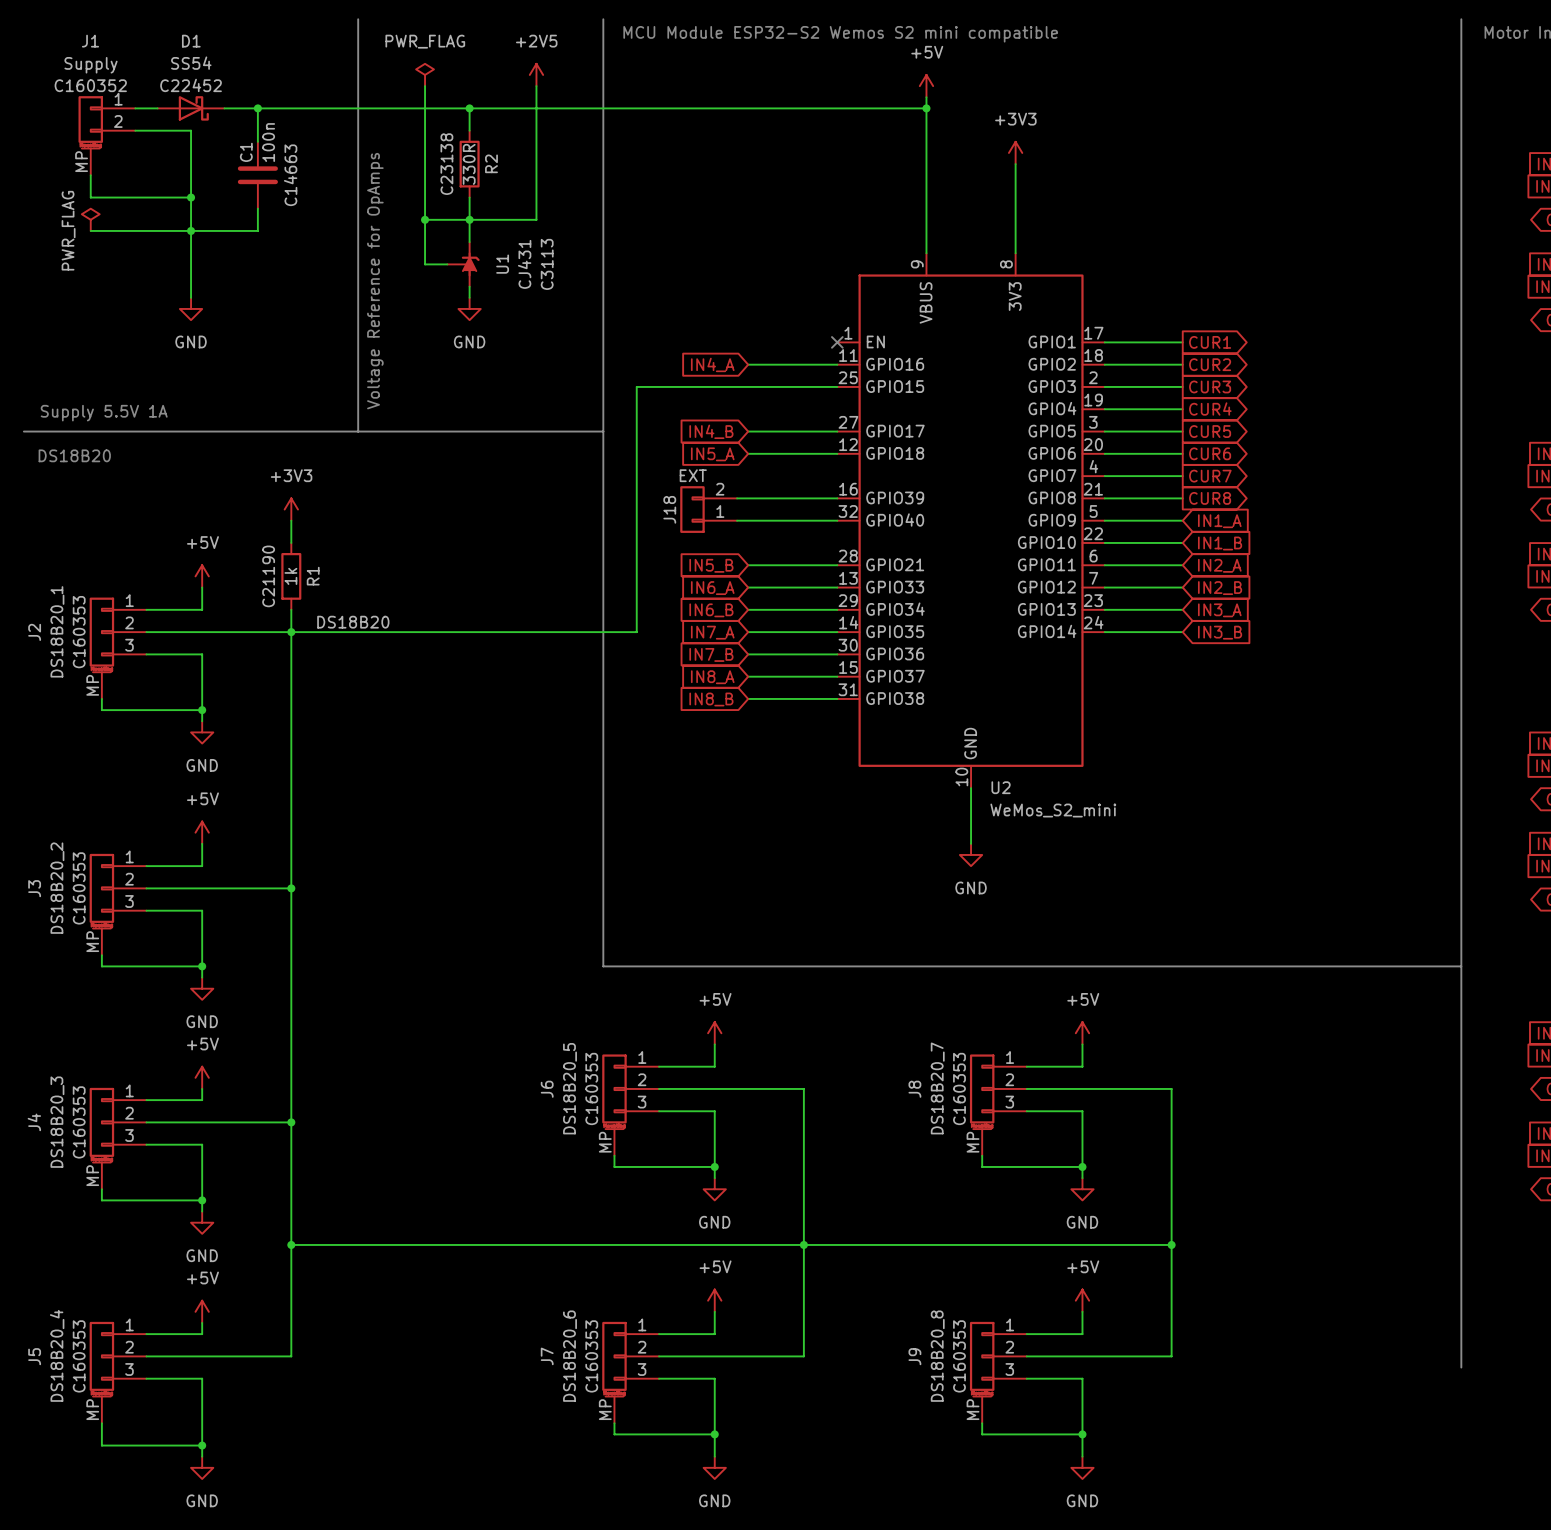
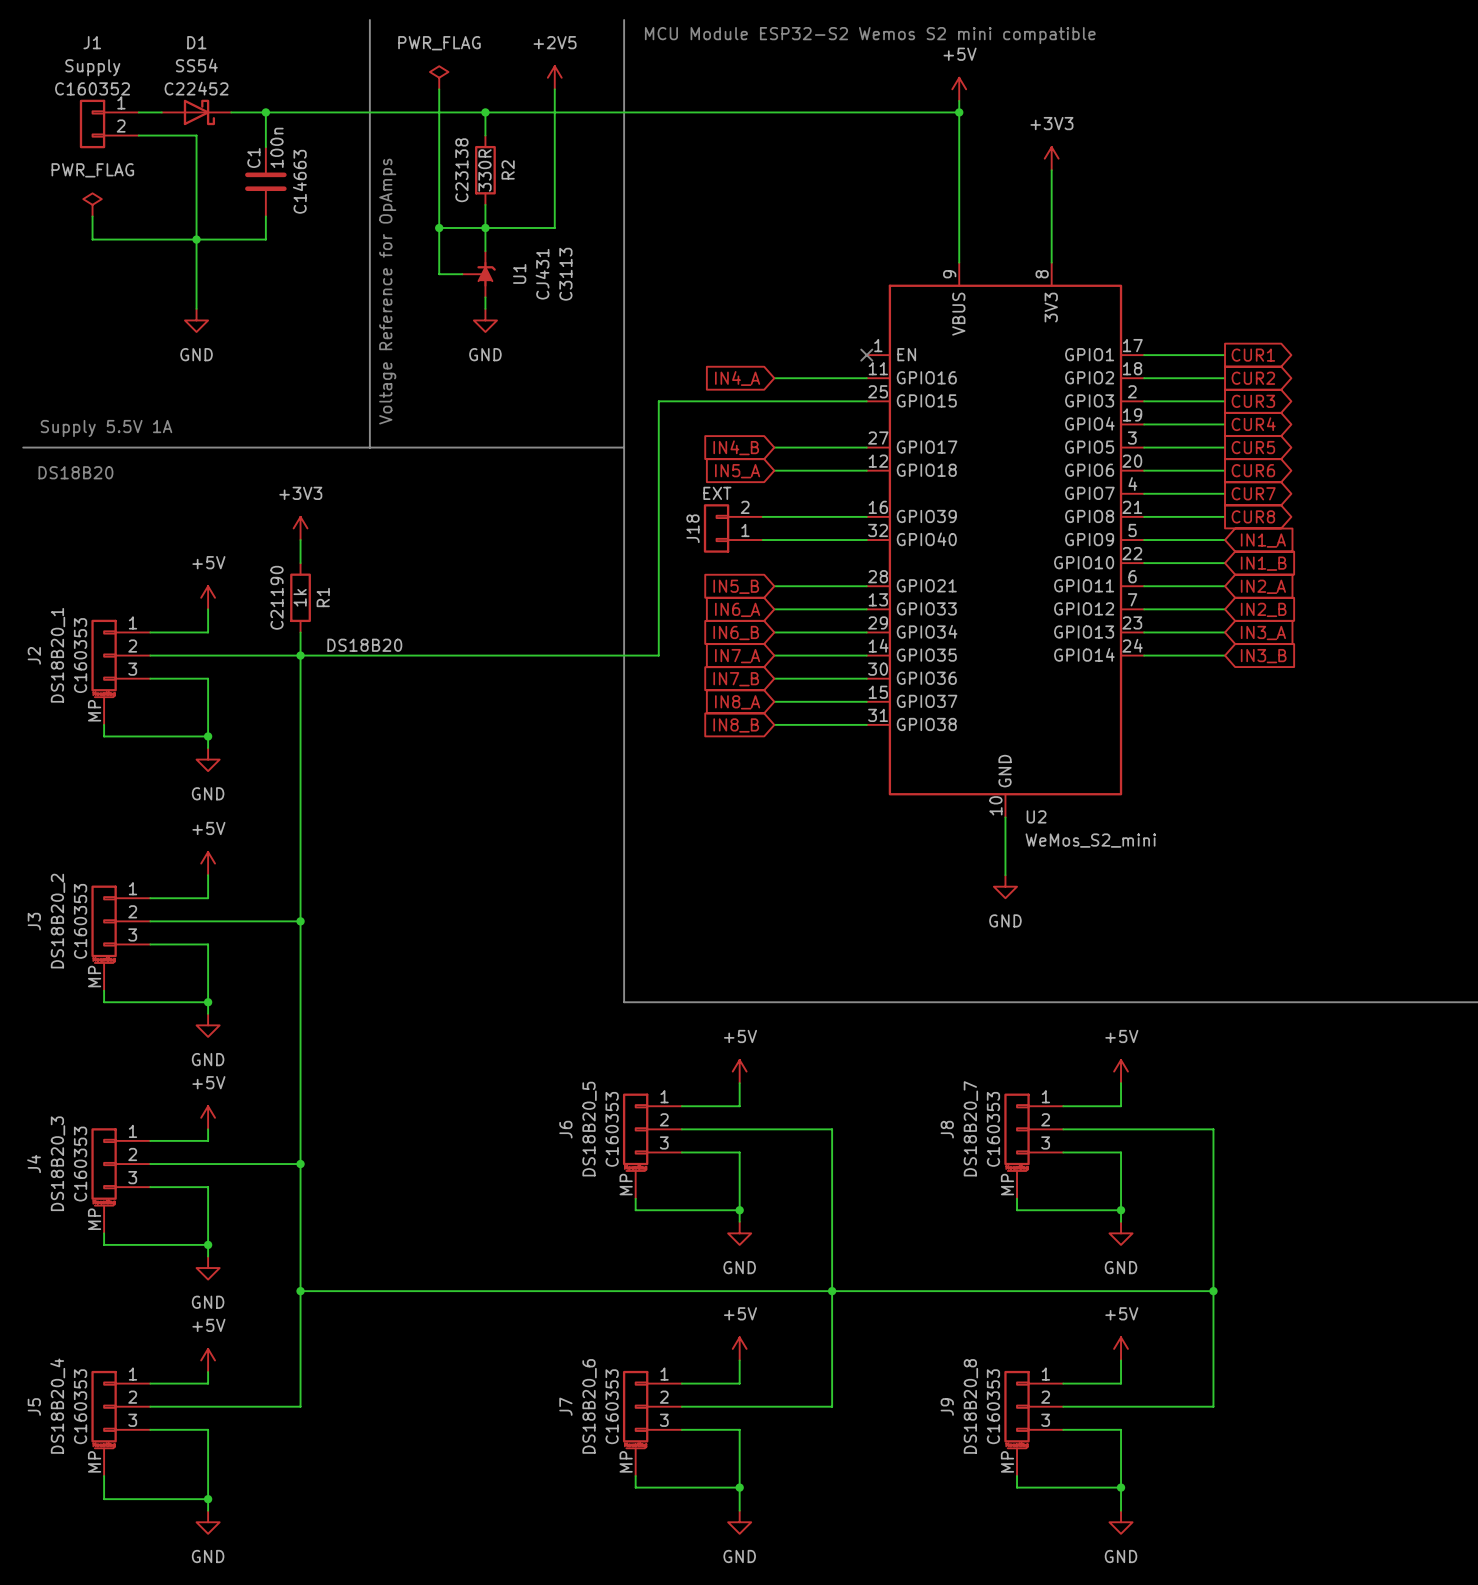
J1 symbol: [78, 96, 136, 176] -> [79, 99, 139, 149]
wire: (90, 175) (90, 197) (191, 197) -> none
junction: (191, 197) -> none
power symbol position: PWR_FLAG (90, 219) -> PWR_FLAG (92, 204)
power symbol text rotation: 0° (68, 230) -> 90° clockwise (92, 170)

